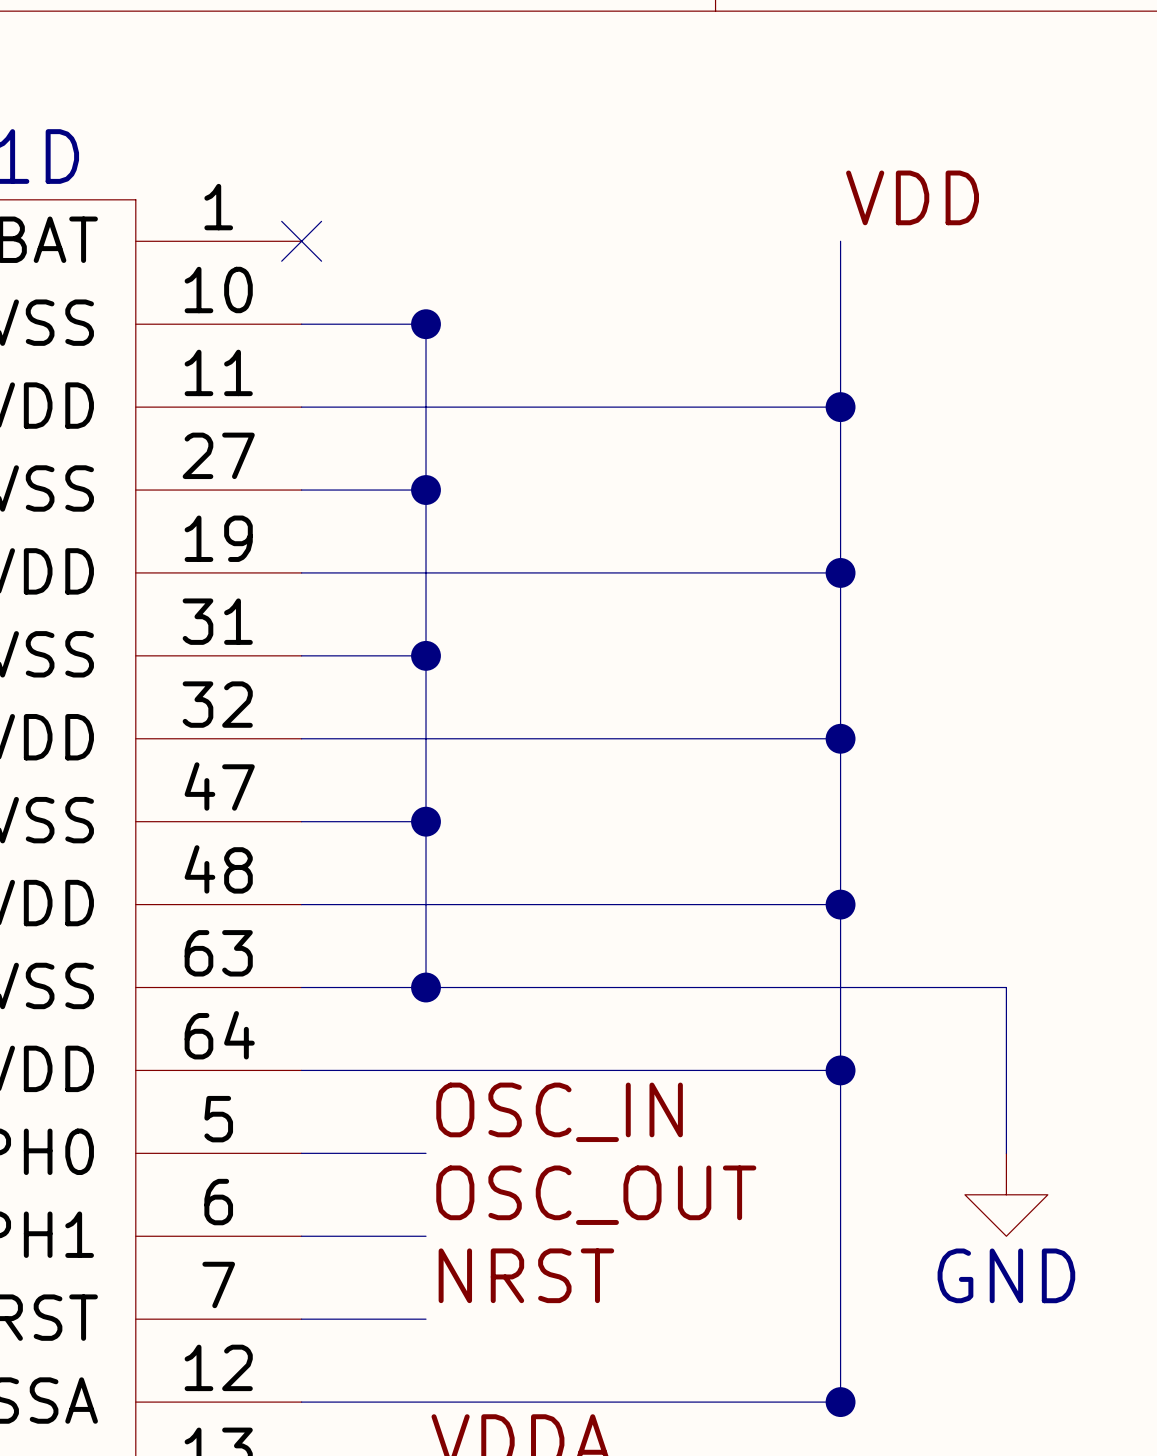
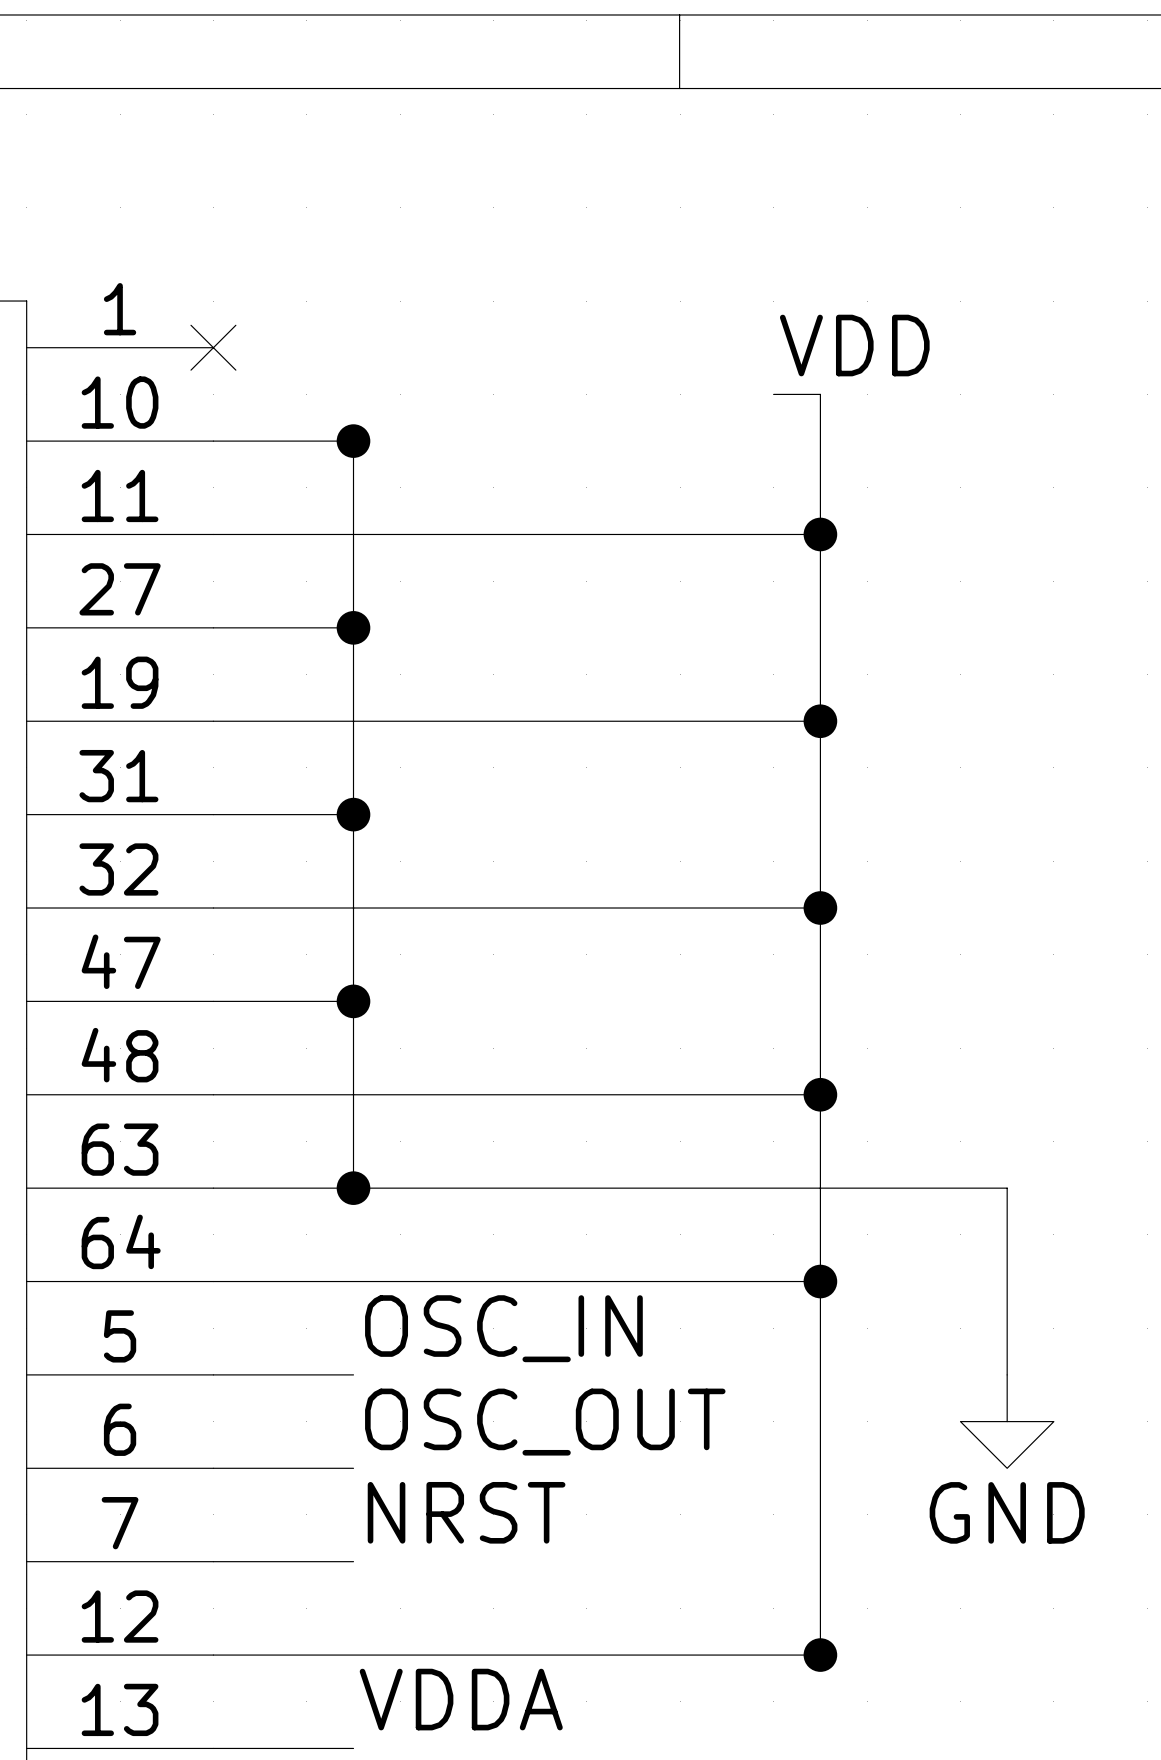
label position: VDD (912, 197) -> VDD (854, 345)
wire: (840, 241) (840, 282) -> (773, 394) (820, 394)

